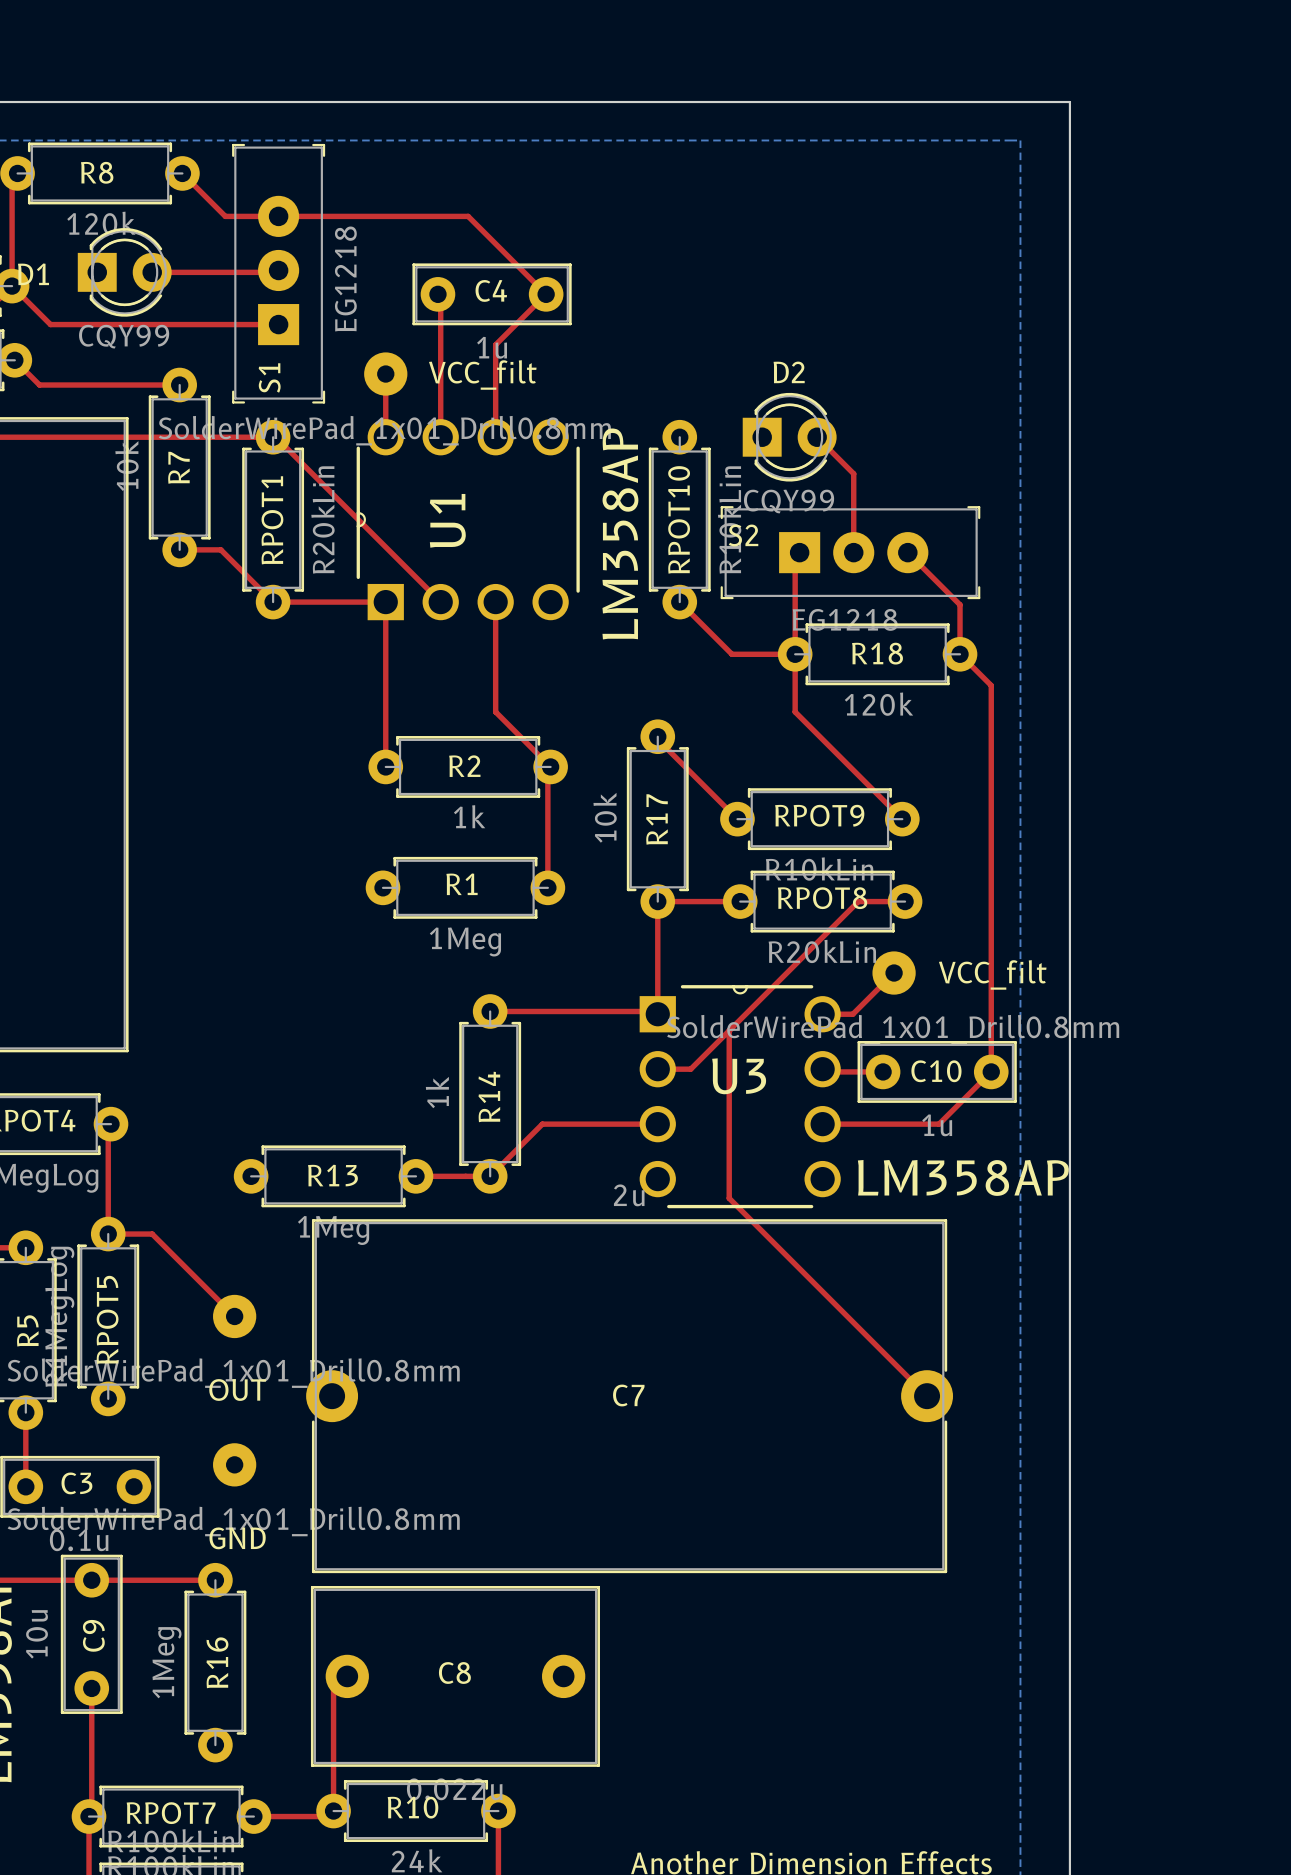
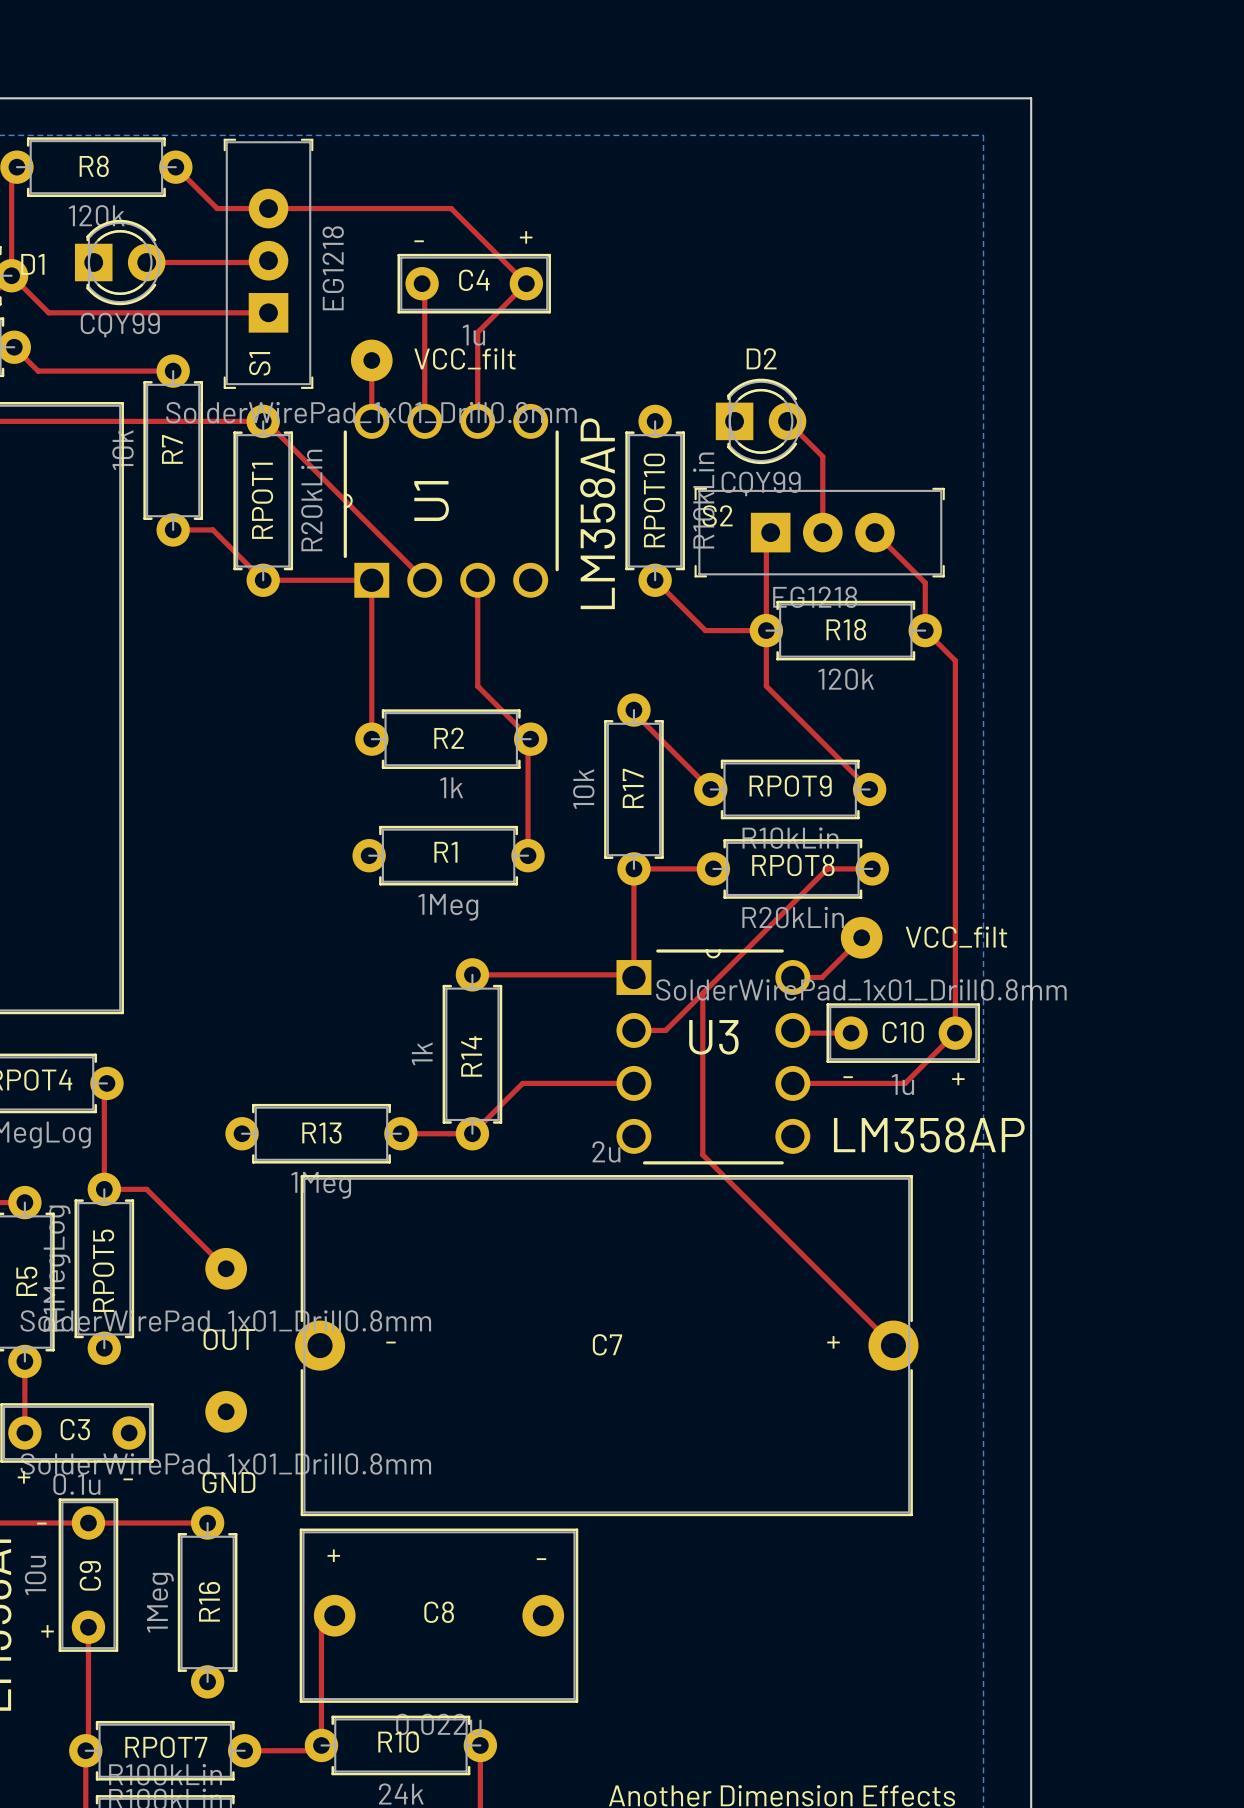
text: none -> + (526, 237)
text: none -> - (419, 241)
text: none -> - (848, 1077)
text: none -> + (958, 1078)
text: none -> + (833, 1342)
text: none -> - (391, 1342)
text: none -> + (23, 1477)
text: none -> - (128, 1479)
text: none -> - (41, 1523)
text: none -> + (333, 1555)
text: none -> - (541, 1559)
text: none -> + (47, 1631)

